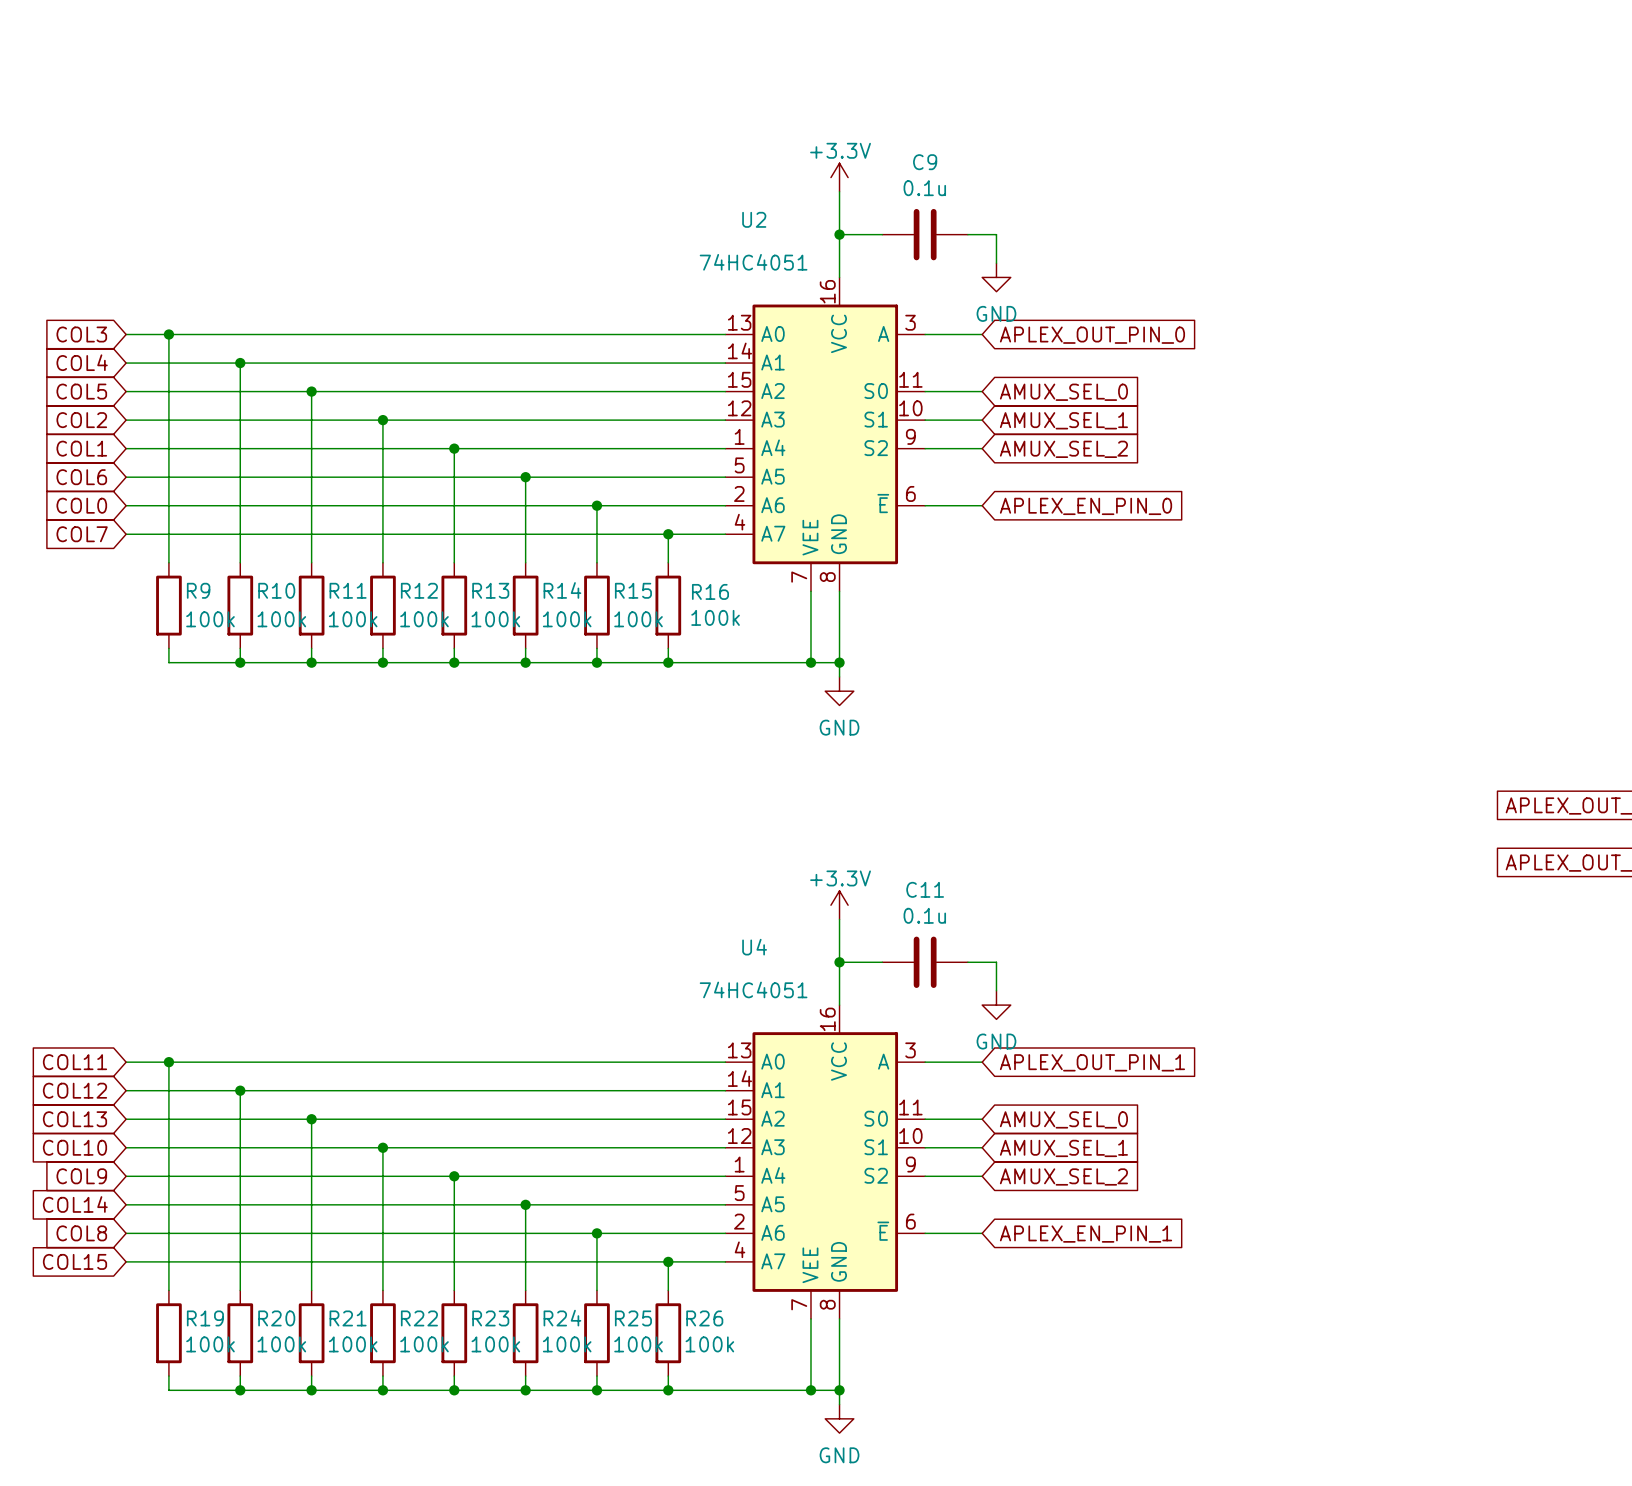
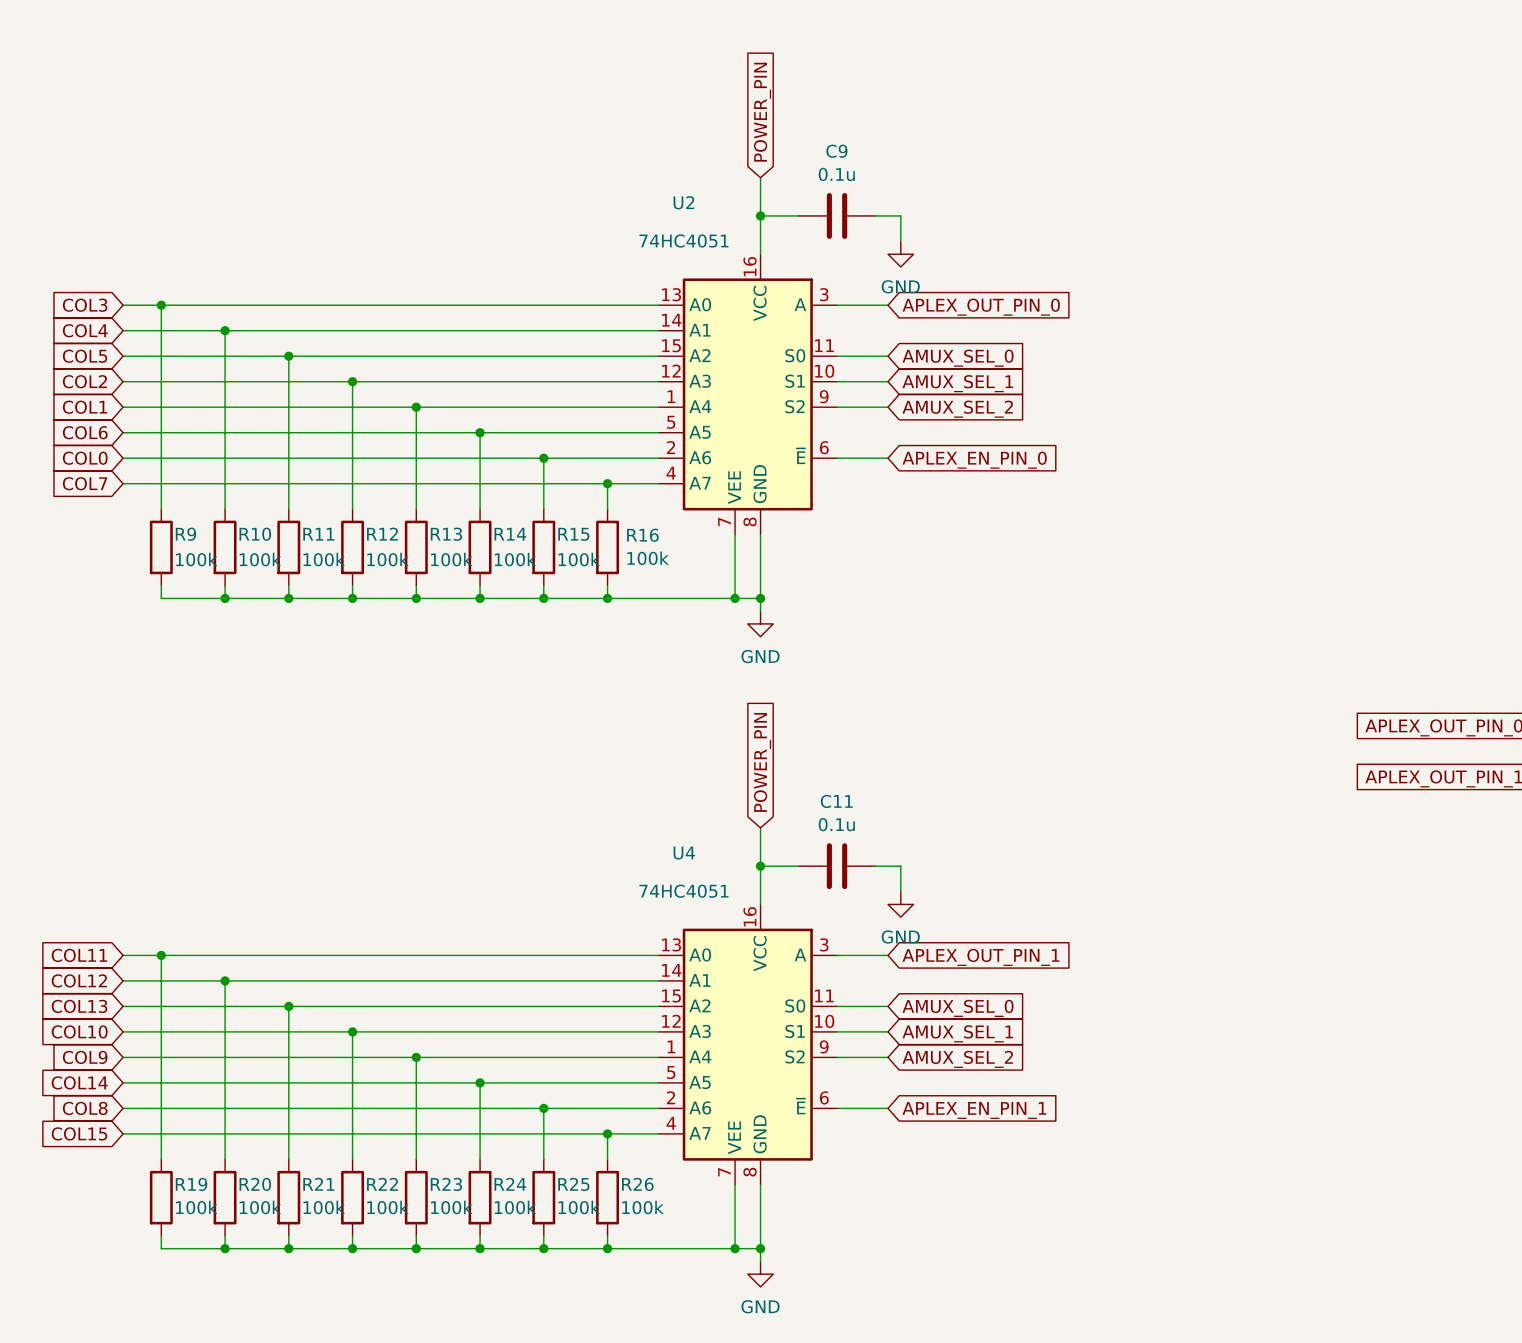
global label: none -> POWER_PIN (762, 112)
power symbol: +3.3V (839, 177) -> none
global label: none -> POWER_PIN (762, 762)
power symbol: +3.3V (839, 905) -> none

